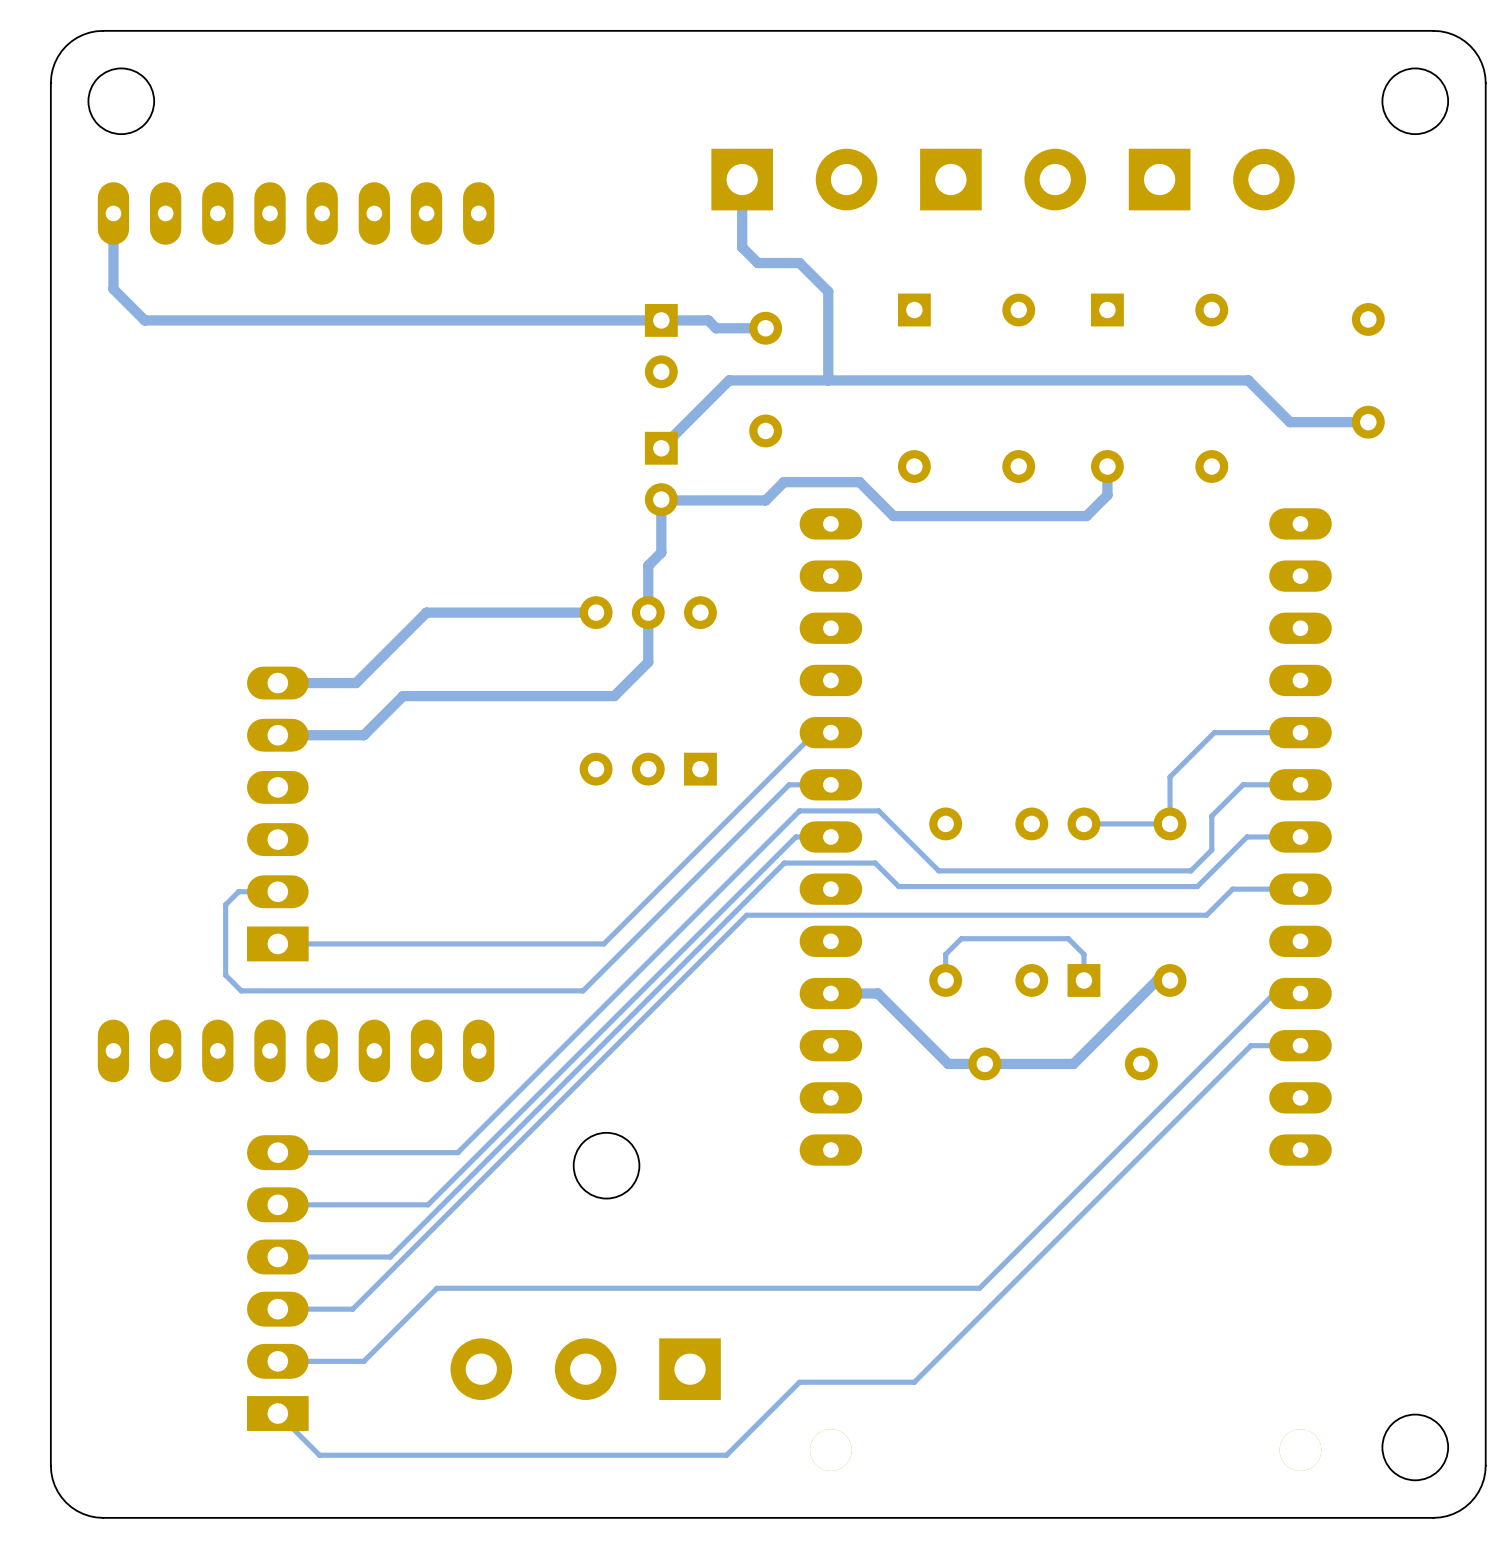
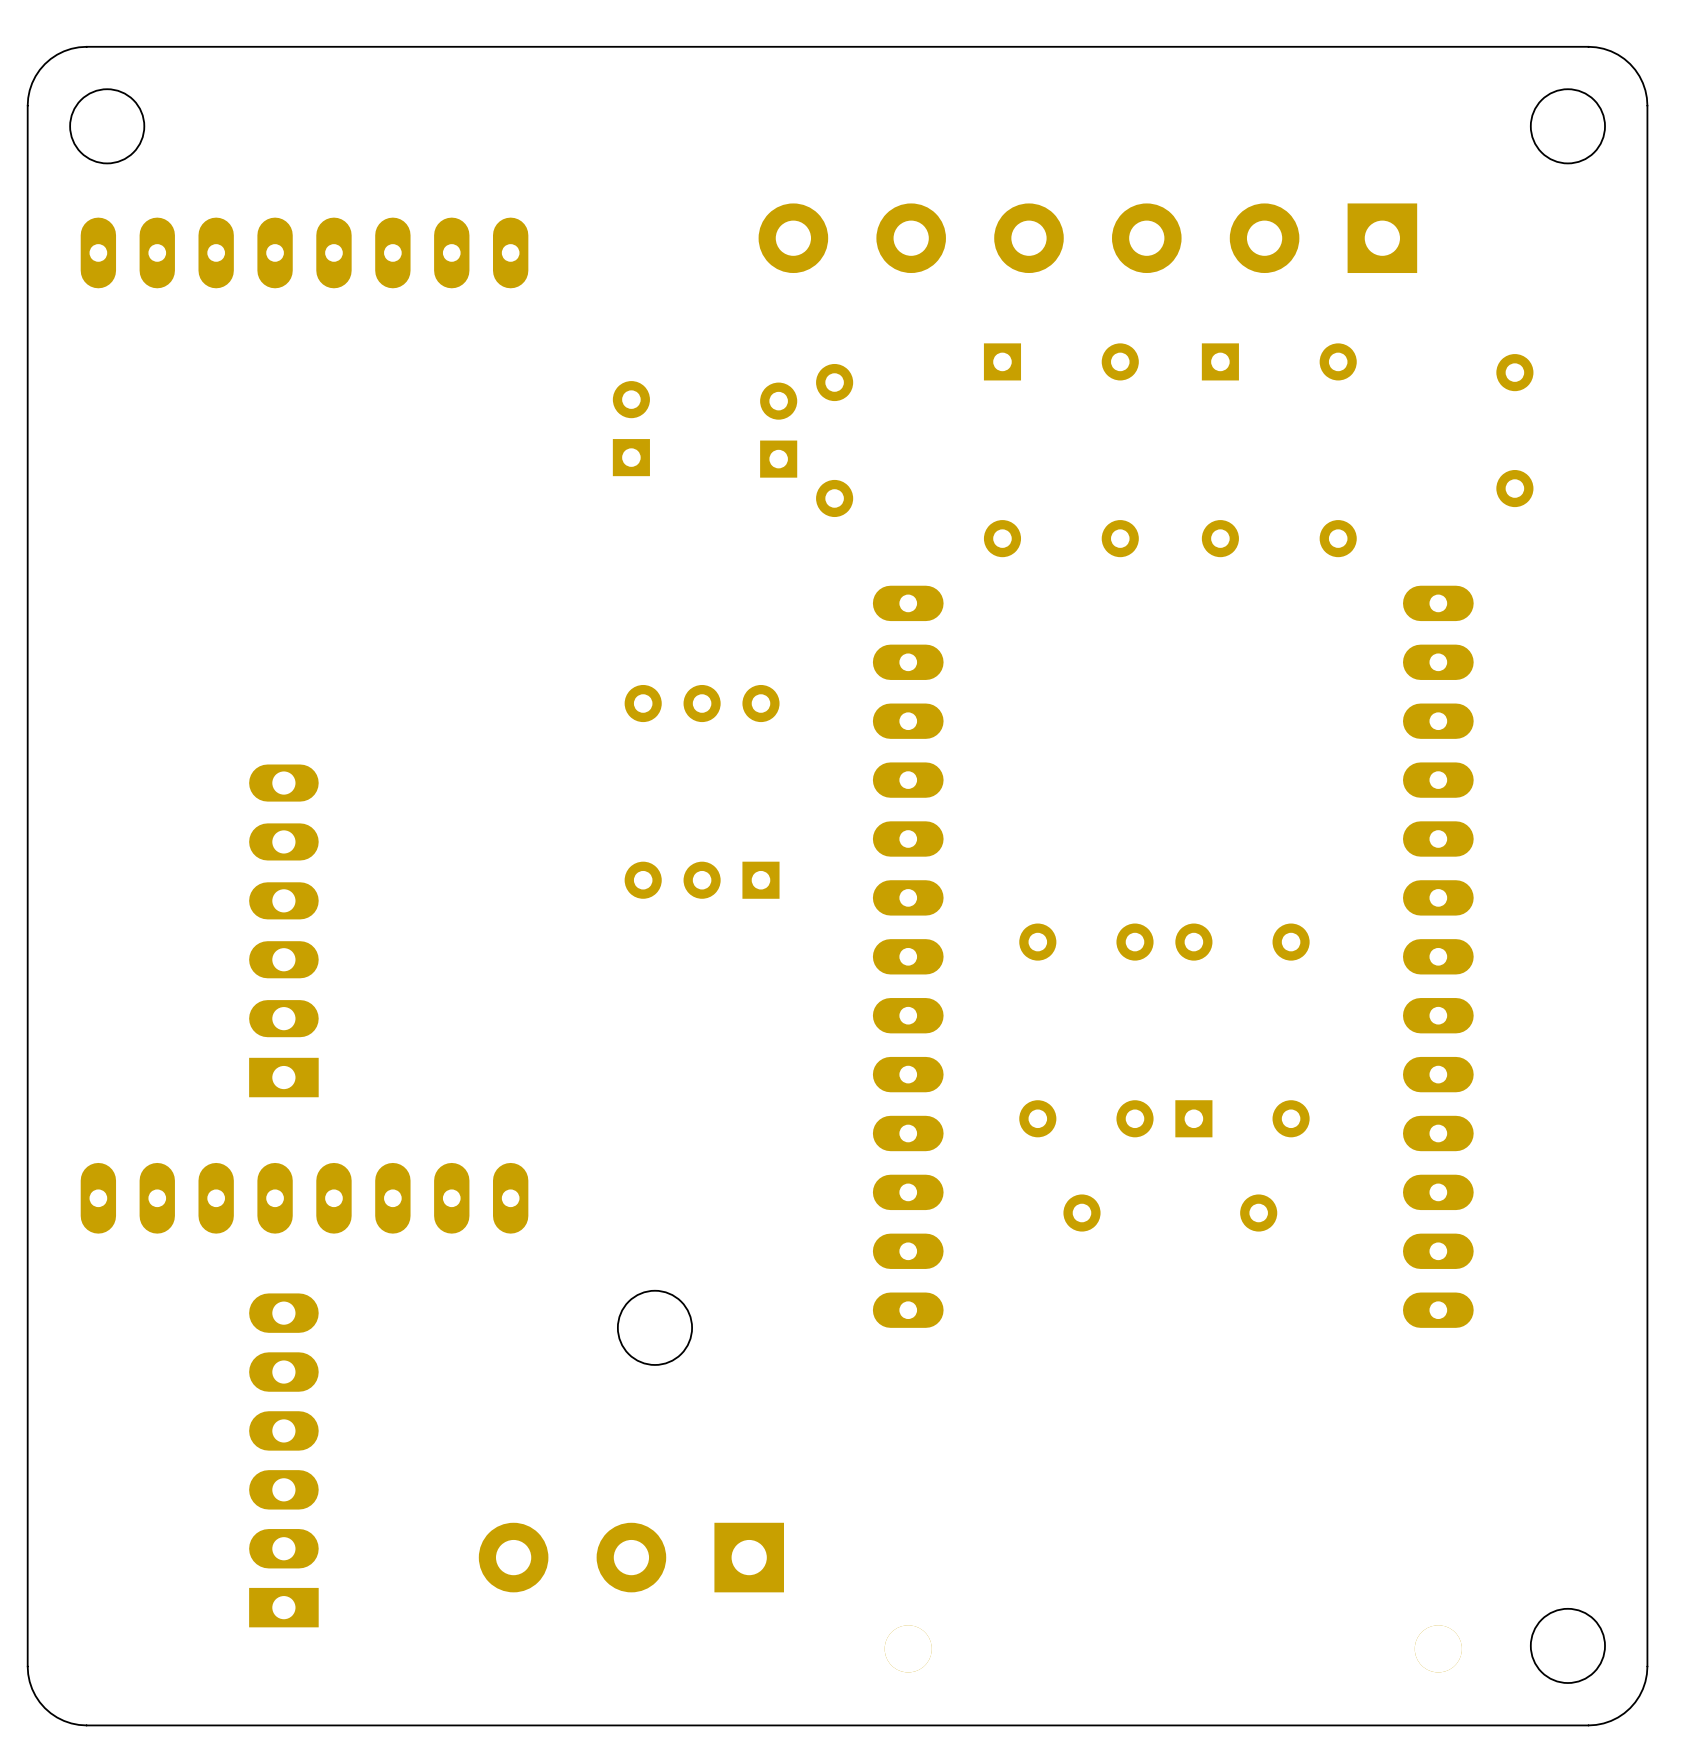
track: (742, 179) (742, 247) (757, 263) (799, 263) (828, 291) (828, 380) -> none
part: (794, 179) -> none
part: (1003, 179) -> none
part: (1211, 179) -> none
part: none -> (1087, 238)
track: (113, 213) (113, 289) (144, 320) (708, 320) (716, 328) (765, 328) -> none
part: (661, 346) -> none
part: none -> (631, 428)
part: none -> (778, 430)
track: (1368, 422) (1290, 422) (1248, 380) (729, 380) (661, 448) -> none
track: (1107, 466) (1107, 495) (1086, 516) (893, 516) (859, 482) (783, 482) (765, 500) (661, 499) (661, 552) (648, 565) (648, 662) (614, 696) (403, 696) (363, 735) (277, 735) -> none
part: (661, 473) -> none
track: (596, 612) (426, 612) (356, 683) (277, 683) -> none
track: (830, 732) (815, 732) (603, 943) (277, 943) -> none
track: (1300, 732) (1214, 732) (1170, 776) (1170, 823) (1083, 823) -> none
track: (830, 784) (789, 784) (583, 990) (241, 990) (225, 975) (225, 904) (238, 891) (277, 891) -> none
track: (1300, 784) (1243, 784) (1211, 816) (1211, 850) (1190, 870) (938, 870) (878, 810) (799, 810) (457, 1152) (277, 1152) -> none
track: (830, 836) (795, 836) (428, 1204) (277, 1204) -> none
track: (1300, 836) (1247, 836) (1197, 886) (898, 886) (875, 863) (784, 863) (390, 1257) (277, 1257) -> none
track: (1300, 889) (1232, 889) (1206, 915) (746, 915) (352, 1309) (277, 1309) -> none
track: (1083, 980) (1083, 954) (1068, 938) (961, 938) (945, 954) (945, 980) -> none
track: (1170, 980) (1157, 980) (1073, 1063) (948, 1063) (877, 993) (830, 993) -> none
track: (1300, 993) (1274, 993) (979, 1288) (436, 1288) (363, 1361) (277, 1361) -> none
track: (1300, 1045) (1250, 1045) (914, 1382) (799, 1382) (726, 1455) (319, 1455) (277, 1413) -> none

